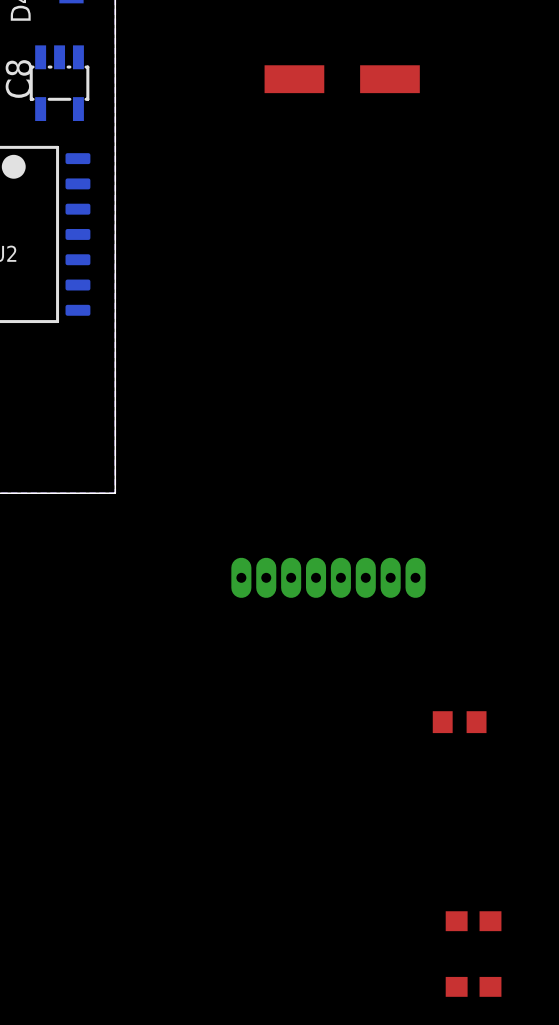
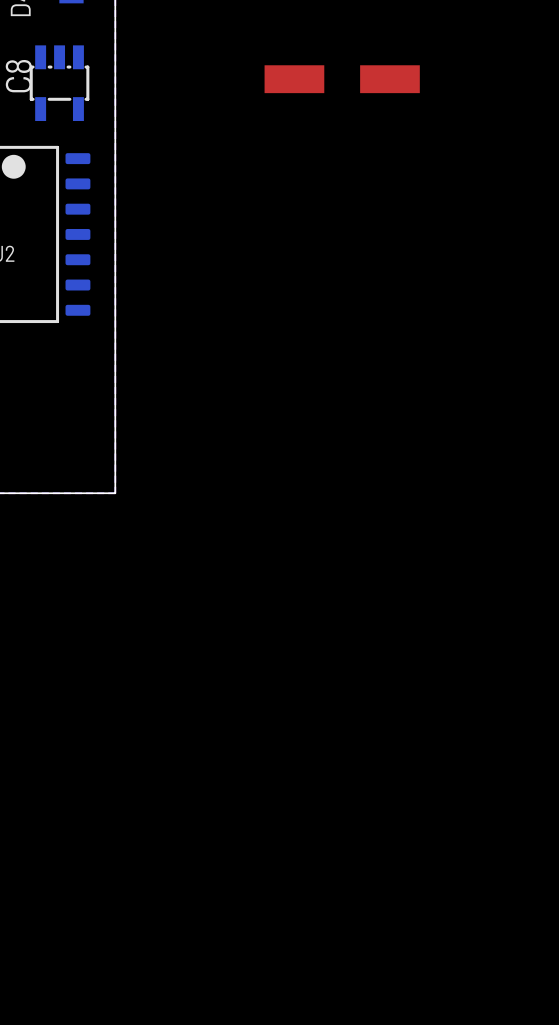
part: (328, 577) -> none
part: (459, 722) -> none
part: (473, 921) -> none
part: (473, 986) -> none

